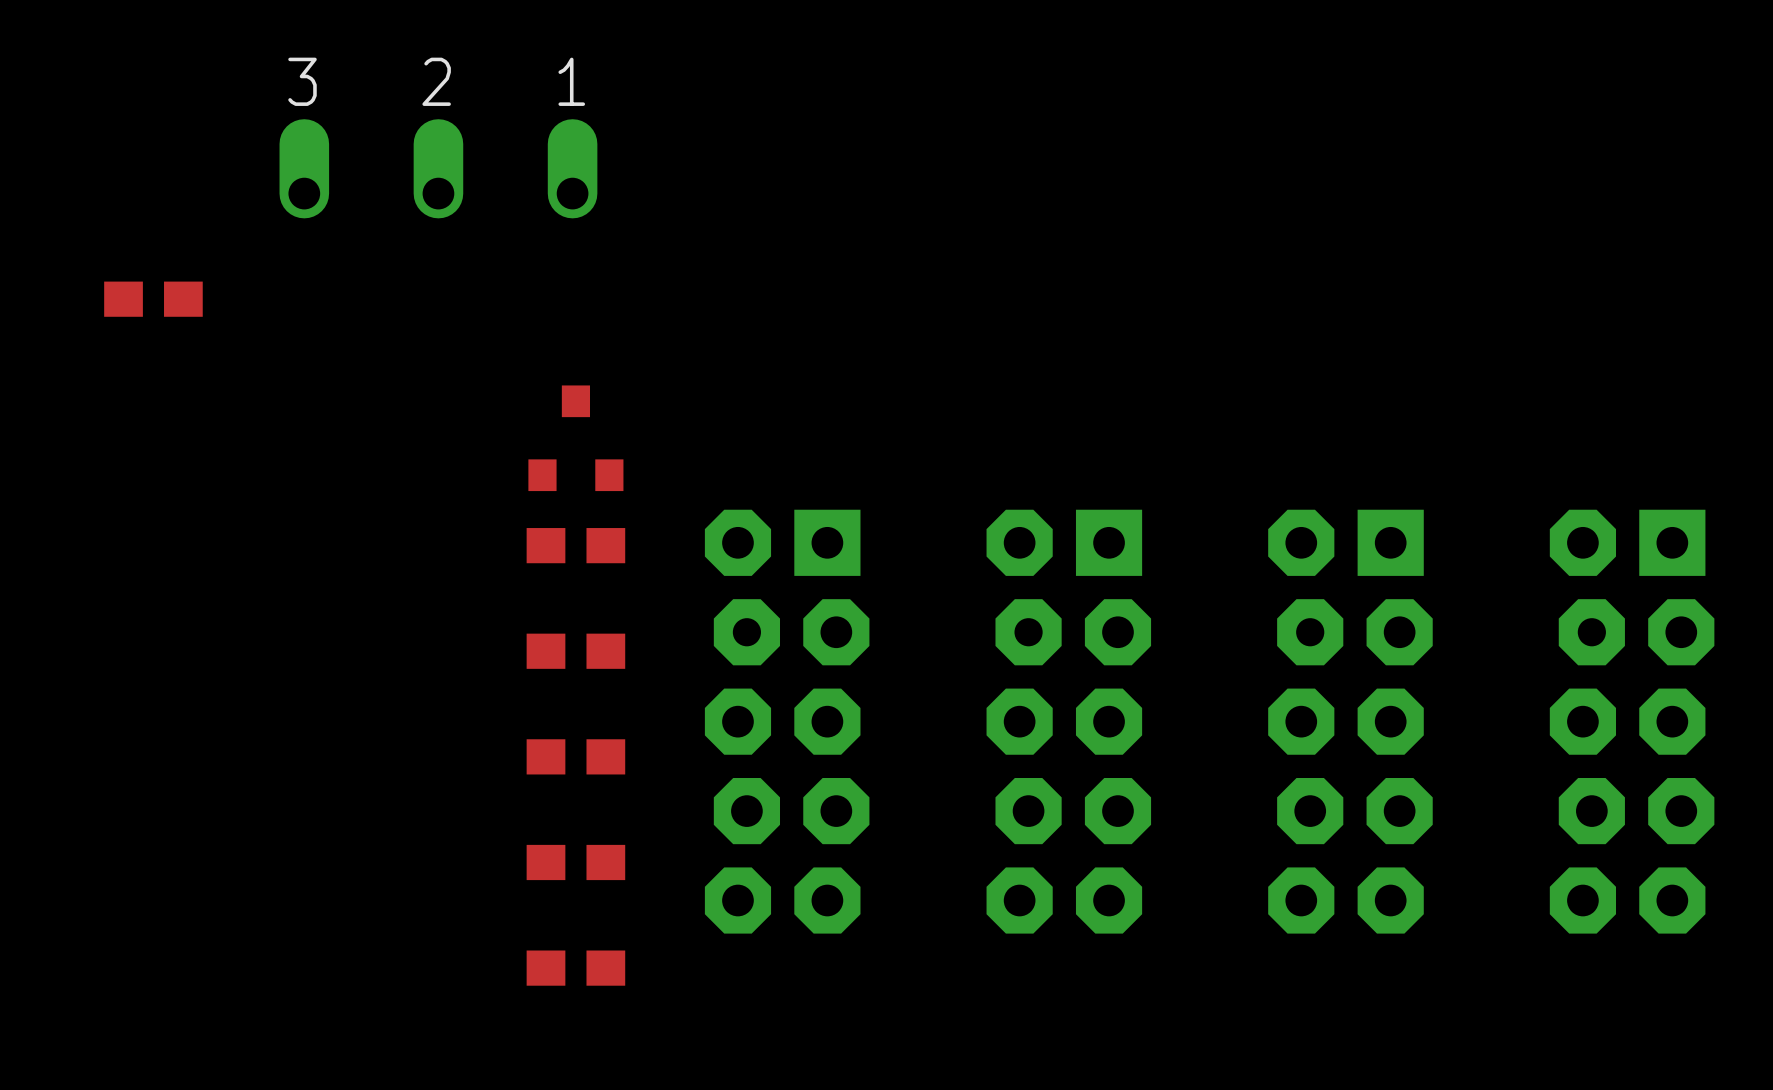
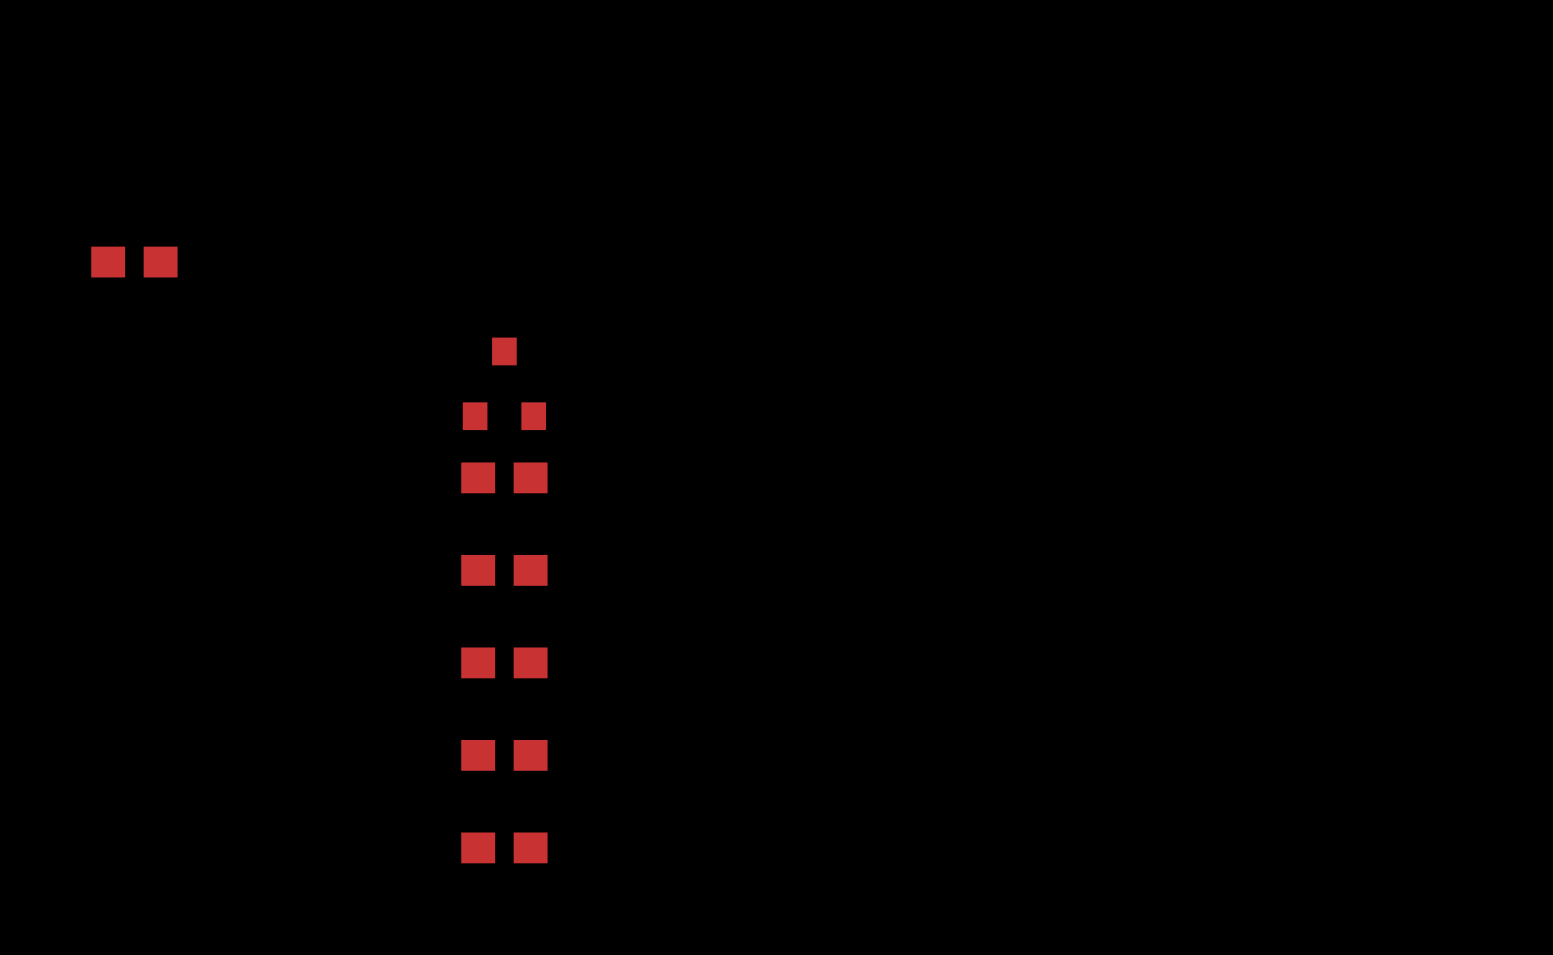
part: (438, 168) -> none
part: (787, 721) -> none
part: (1068, 721) -> none
part: (1350, 721) -> none
part: (1632, 721) -> none

